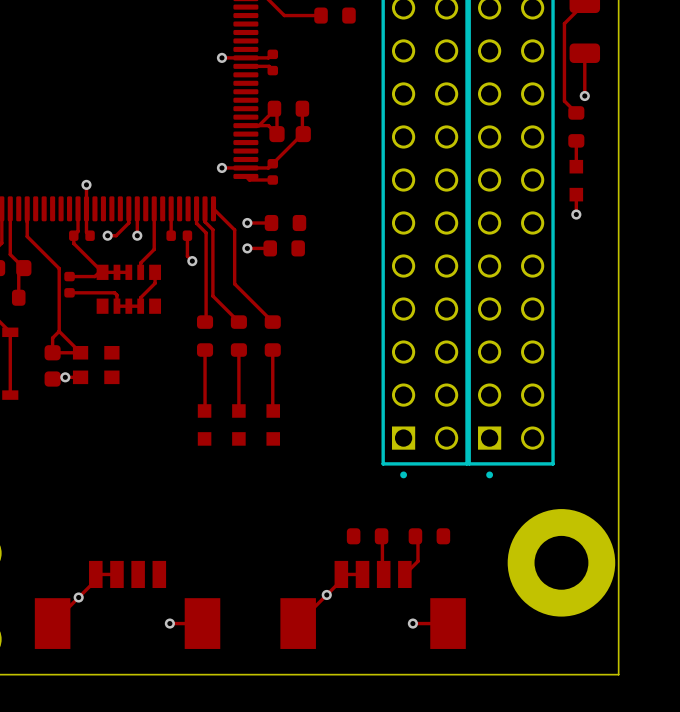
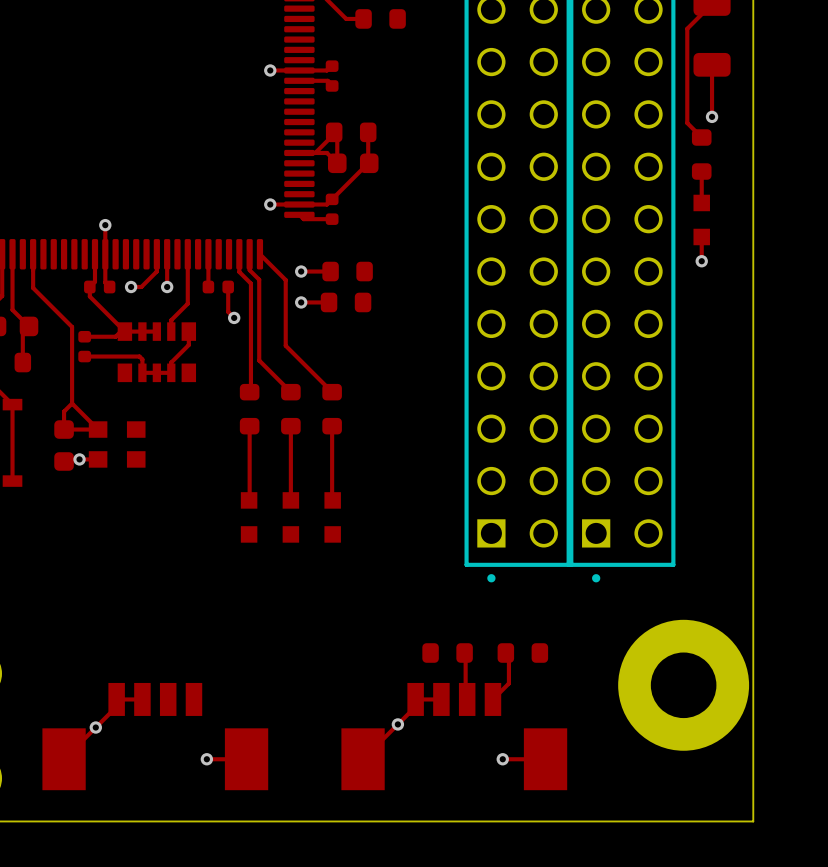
part: none -> (380, 18)
top track: (321, 15) (298, 15) -> none
part: (335, 15) -> none

